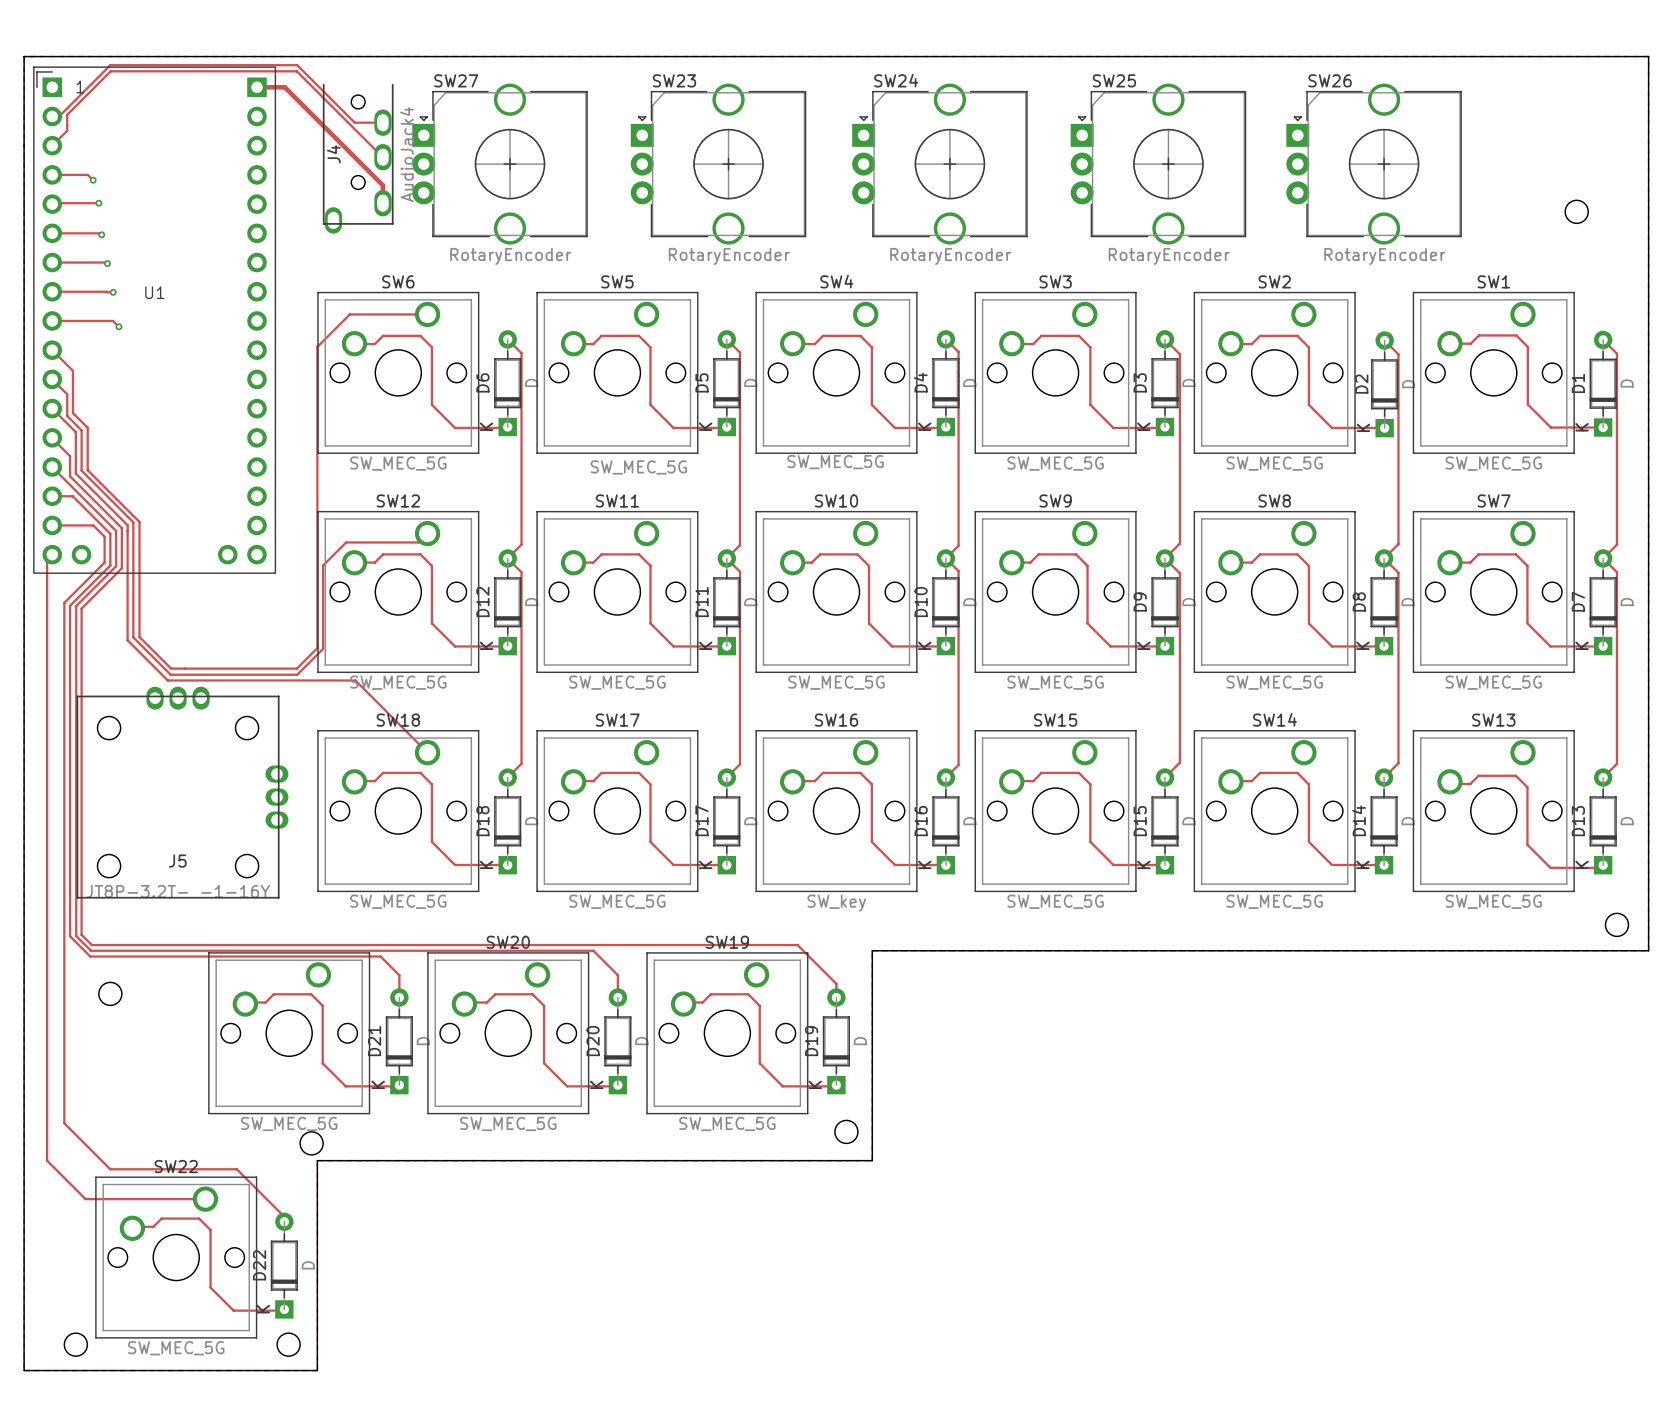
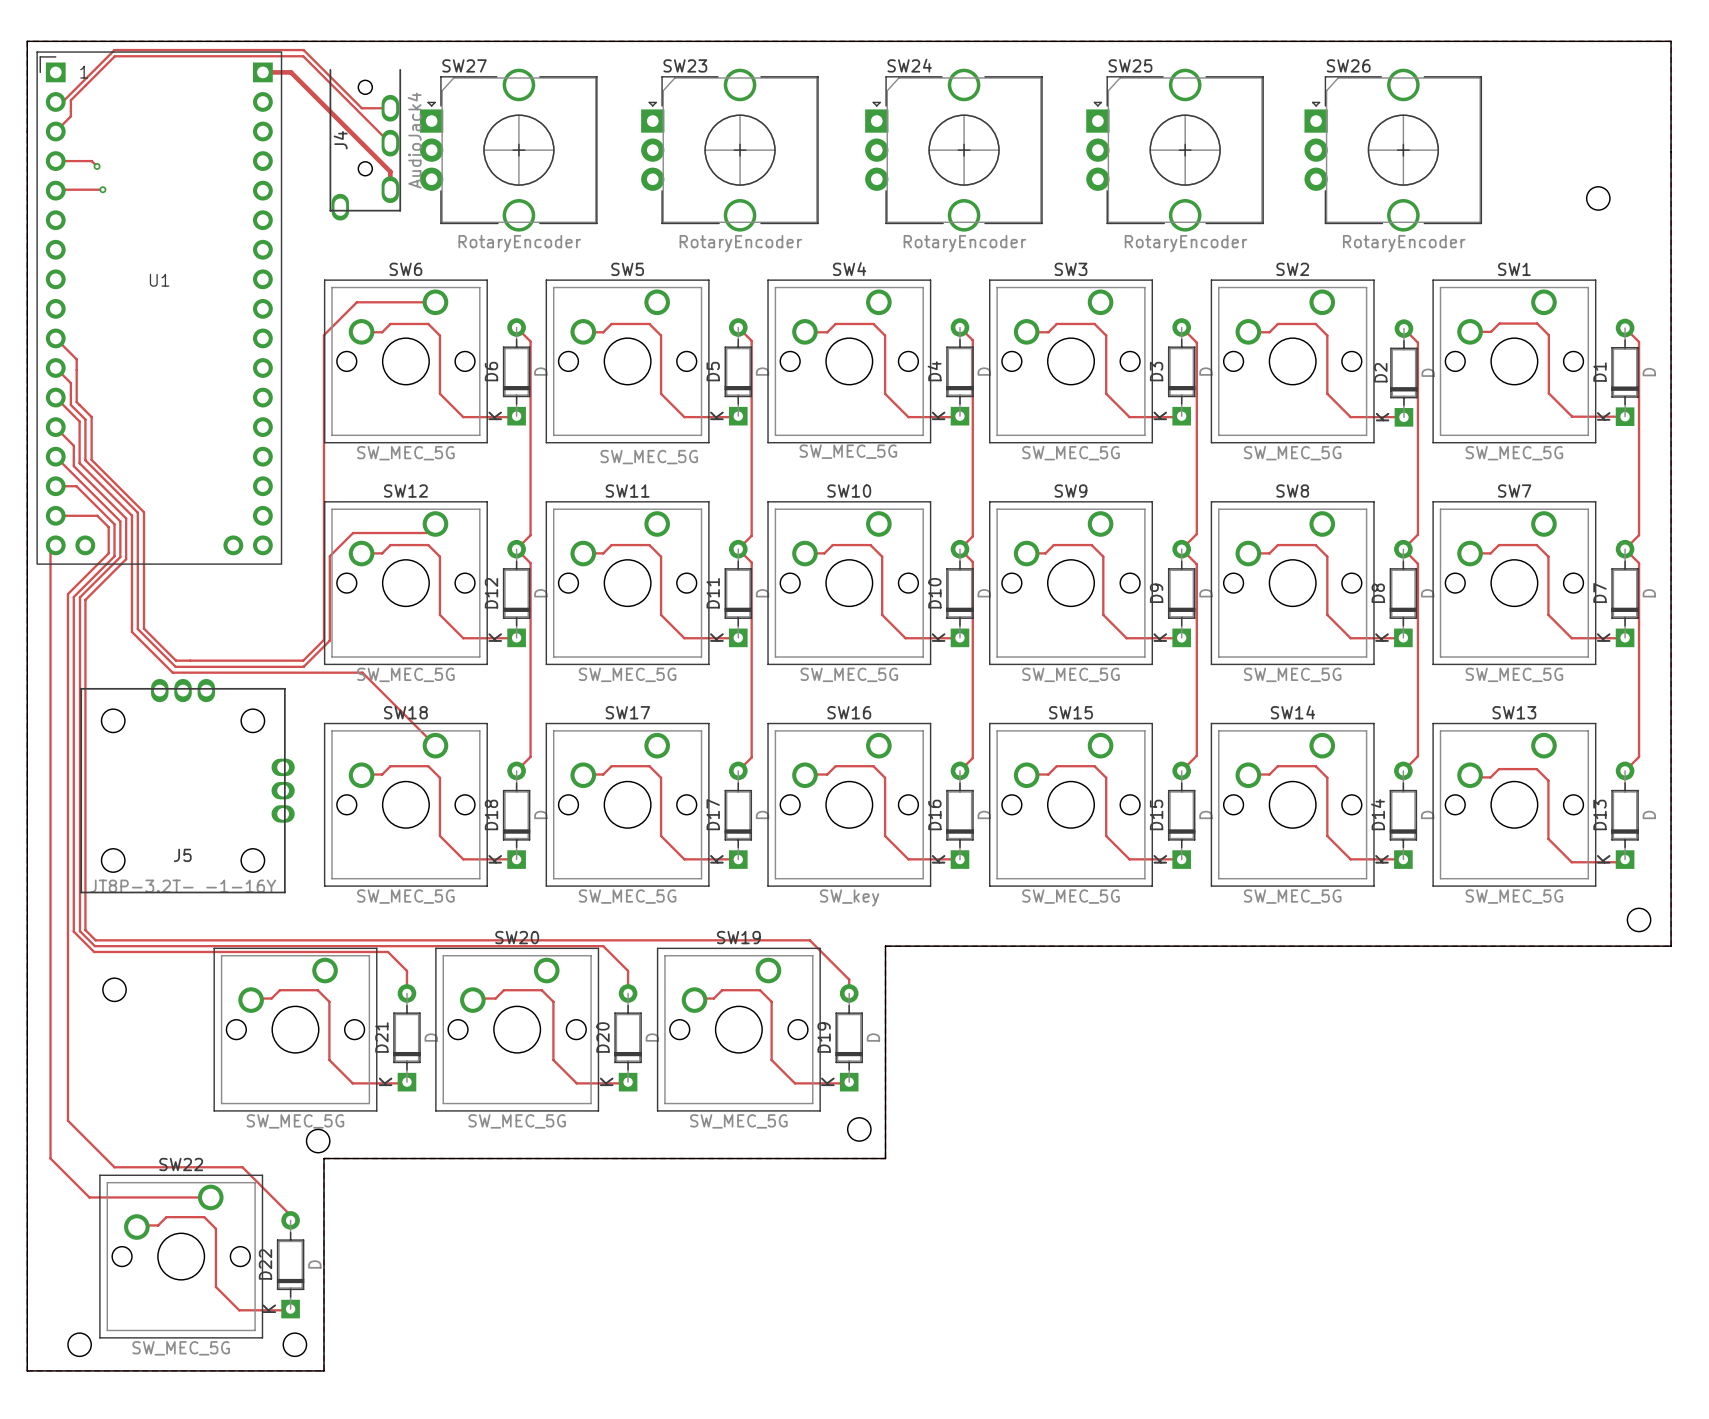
track: (52, 233) (101, 234) -> none
via: (101, 234) -> none
track: (52, 262) (107, 263) -> none
via: (107, 263) -> none
track: (52, 291) (113, 292) -> none
via: (113, 292) -> none
track: (52, 320) (113, 320) (118, 326) -> none
via: (118, 326) -> none

